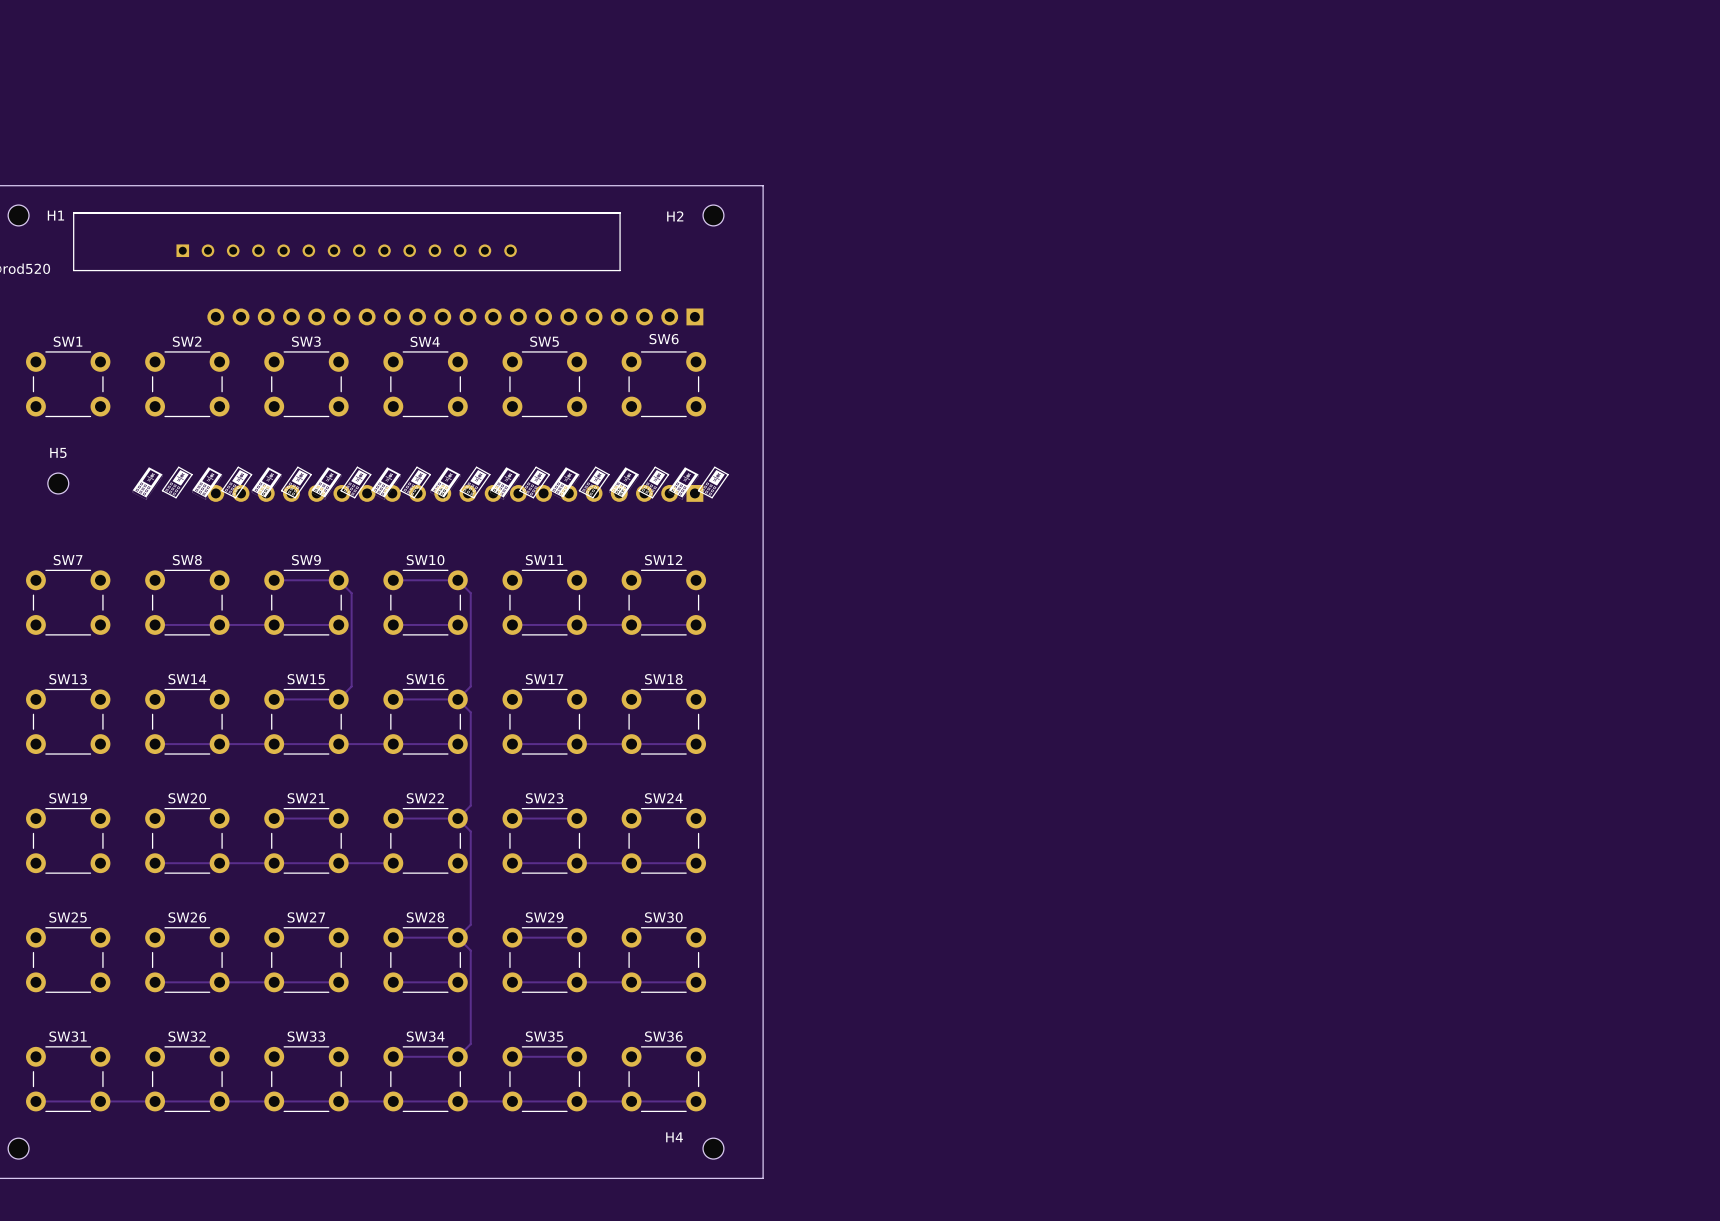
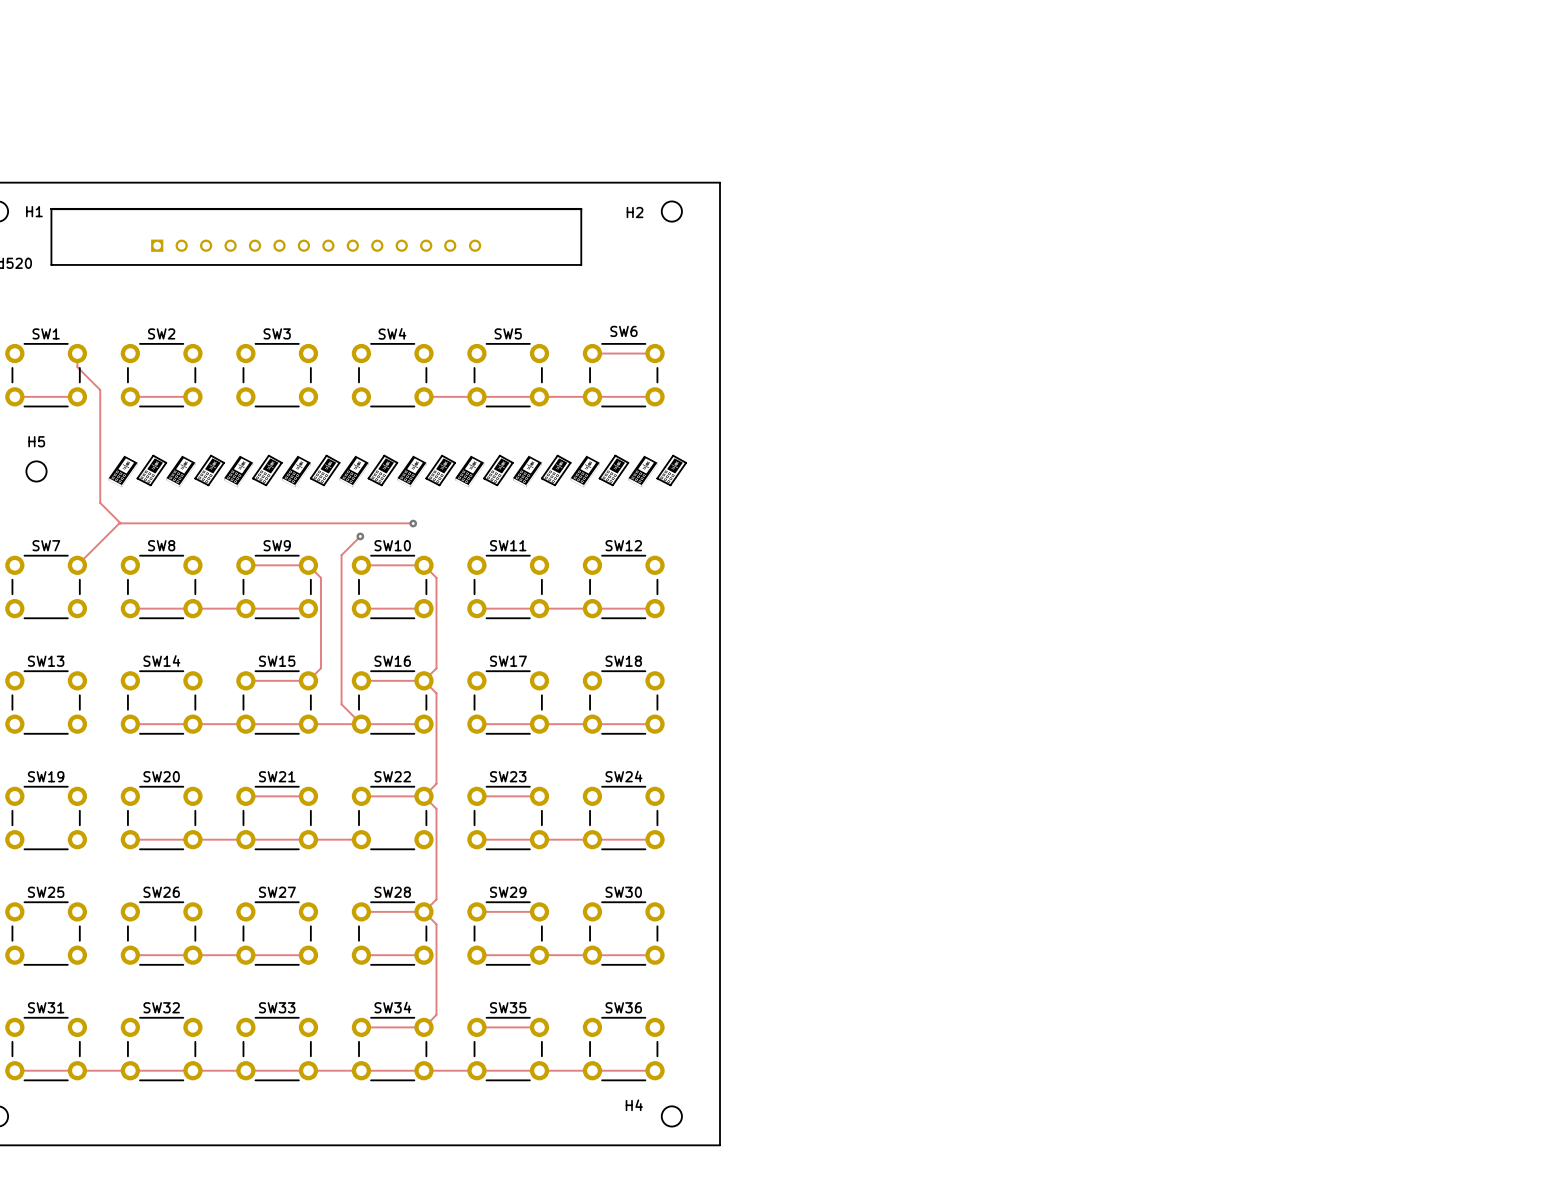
part: (455, 316) -> none
track: none -> (77, 353) (77, 367) (100, 389) (100, 502) (120, 523)
track: none -> (592, 353) (655, 353)
track: none -> (14, 396) (77, 396)
track: none -> (130, 396) (192, 396)
track: none -> (423, 396) (655, 396)
part: (455, 493) -> none
track: none -> (413, 523) (119, 523) (77, 565)
via: none -> (413, 523)
track: none -> (360, 536) (341, 555) (341, 704) (361, 724)
via: none -> (360, 536)

